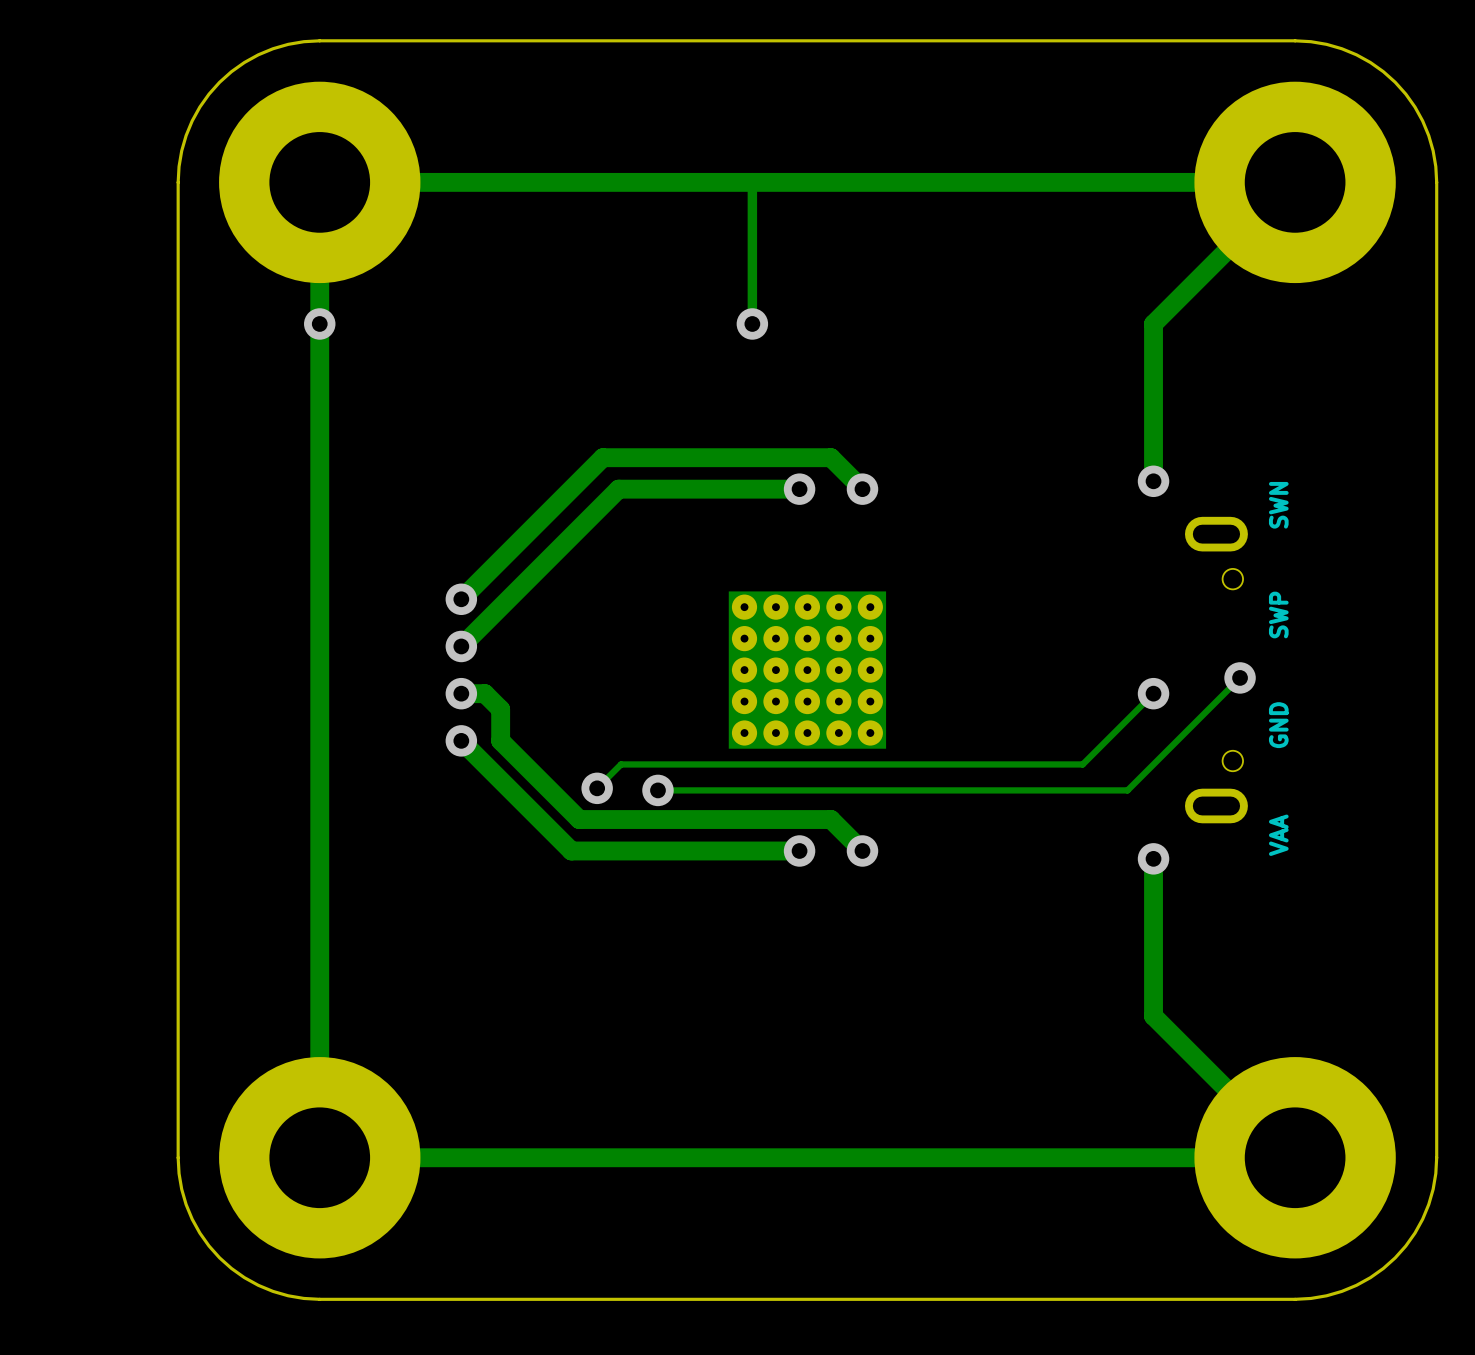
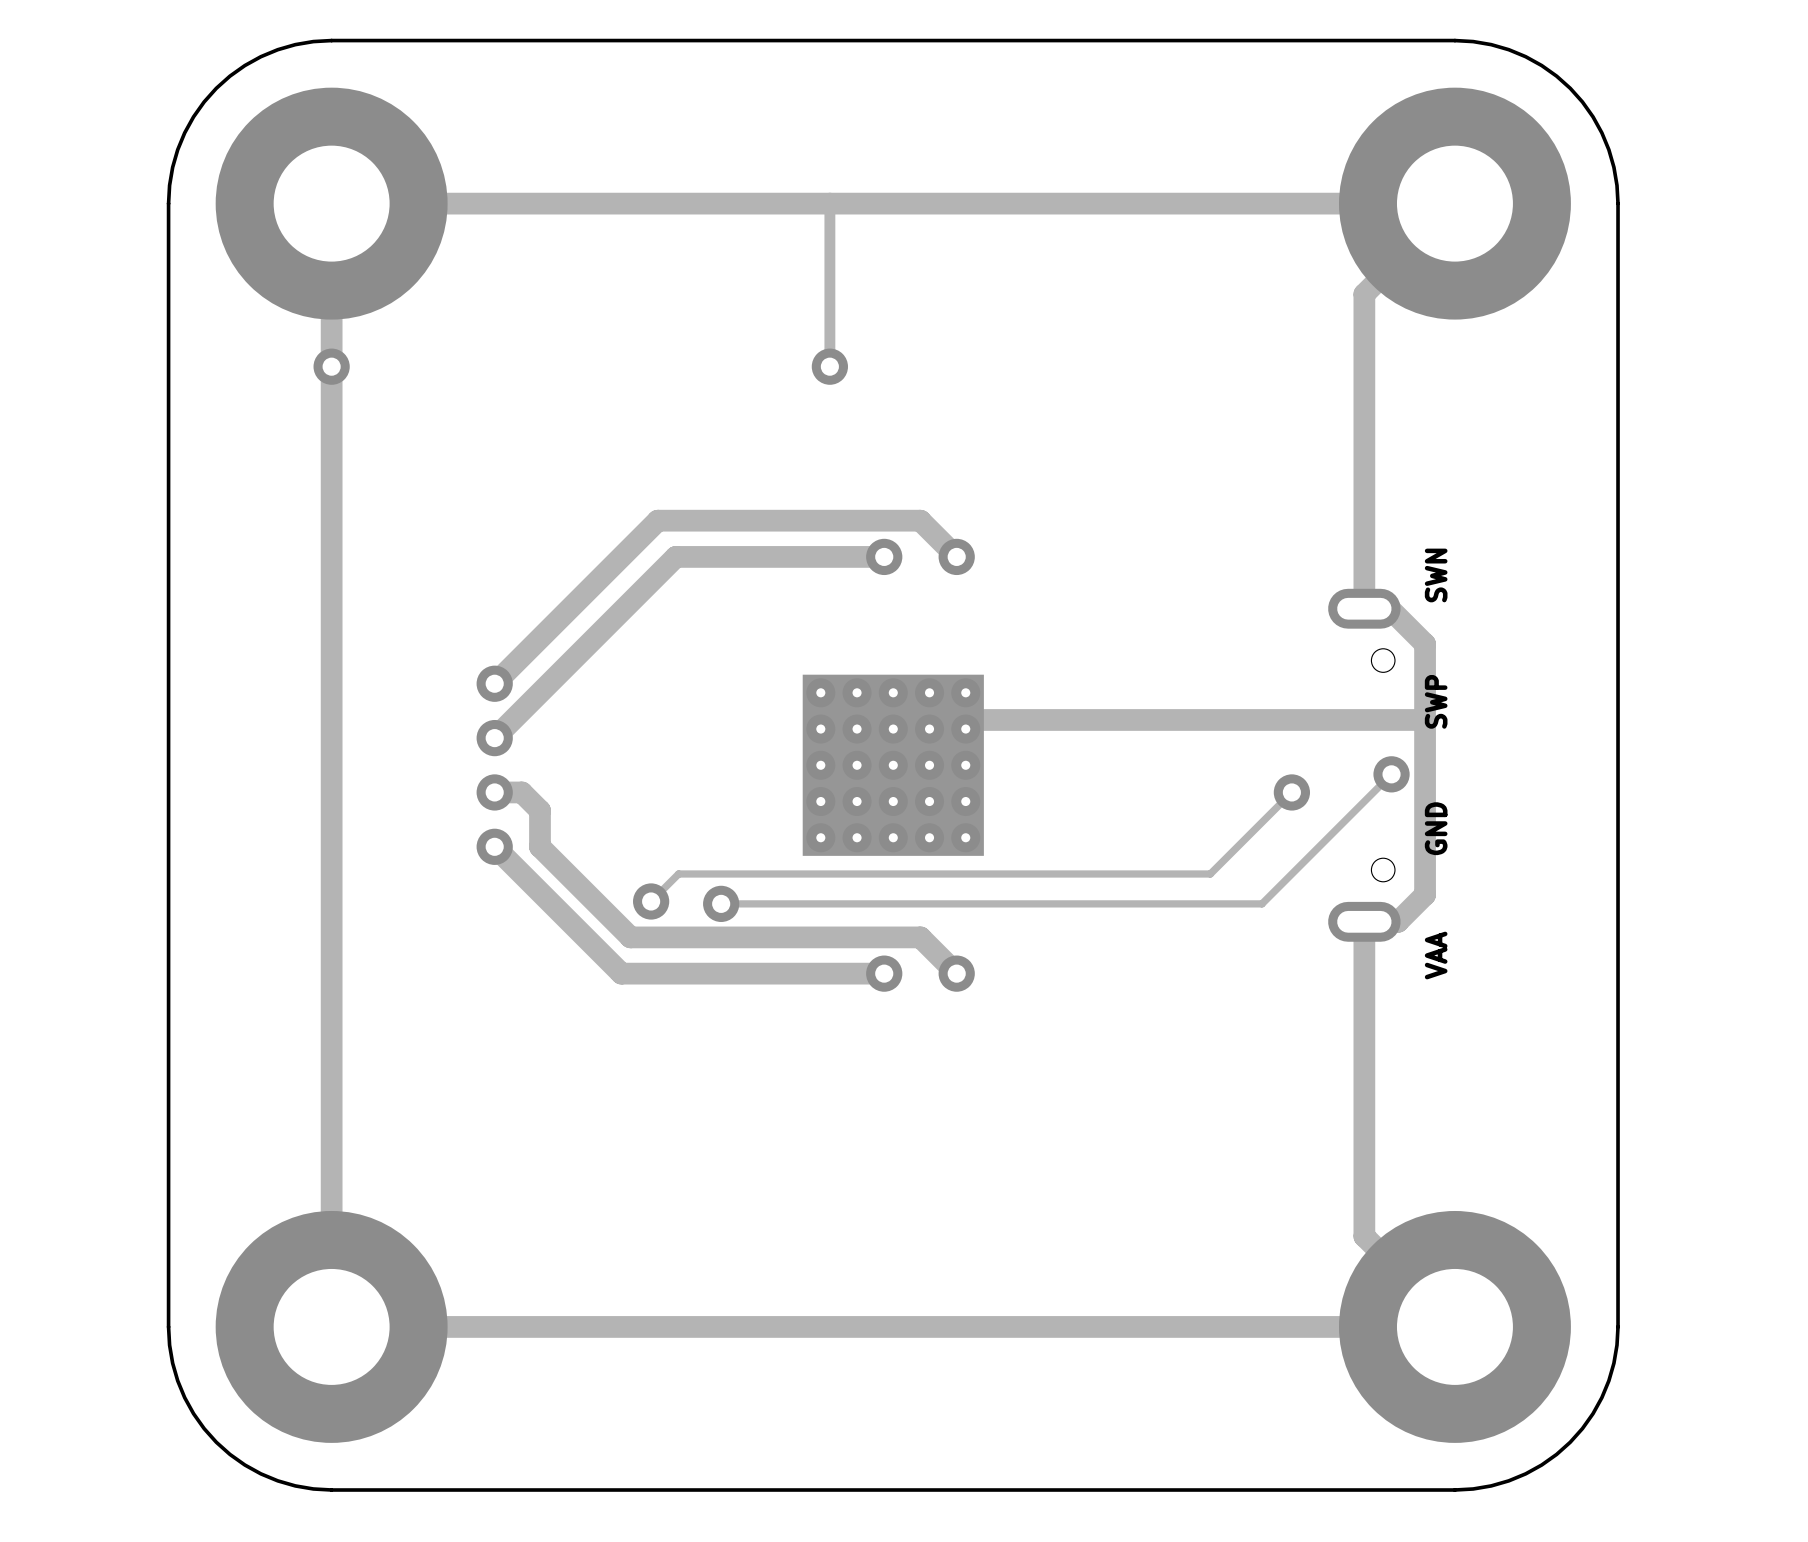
track: (1216, 261) (1153, 323) (1153, 481) -> (1364, 294) (1364, 608) (1389, 608) (1425, 644) (1425, 894) (1398, 921) (1364, 921) (1364, 1236)
via: (1153, 481) -> none
track: none -> (1425, 719) (938, 719) (893, 765)
track: (1153, 858) (1153, 1016) (1216, 1079) -> none
via: (1153, 858) -> none

